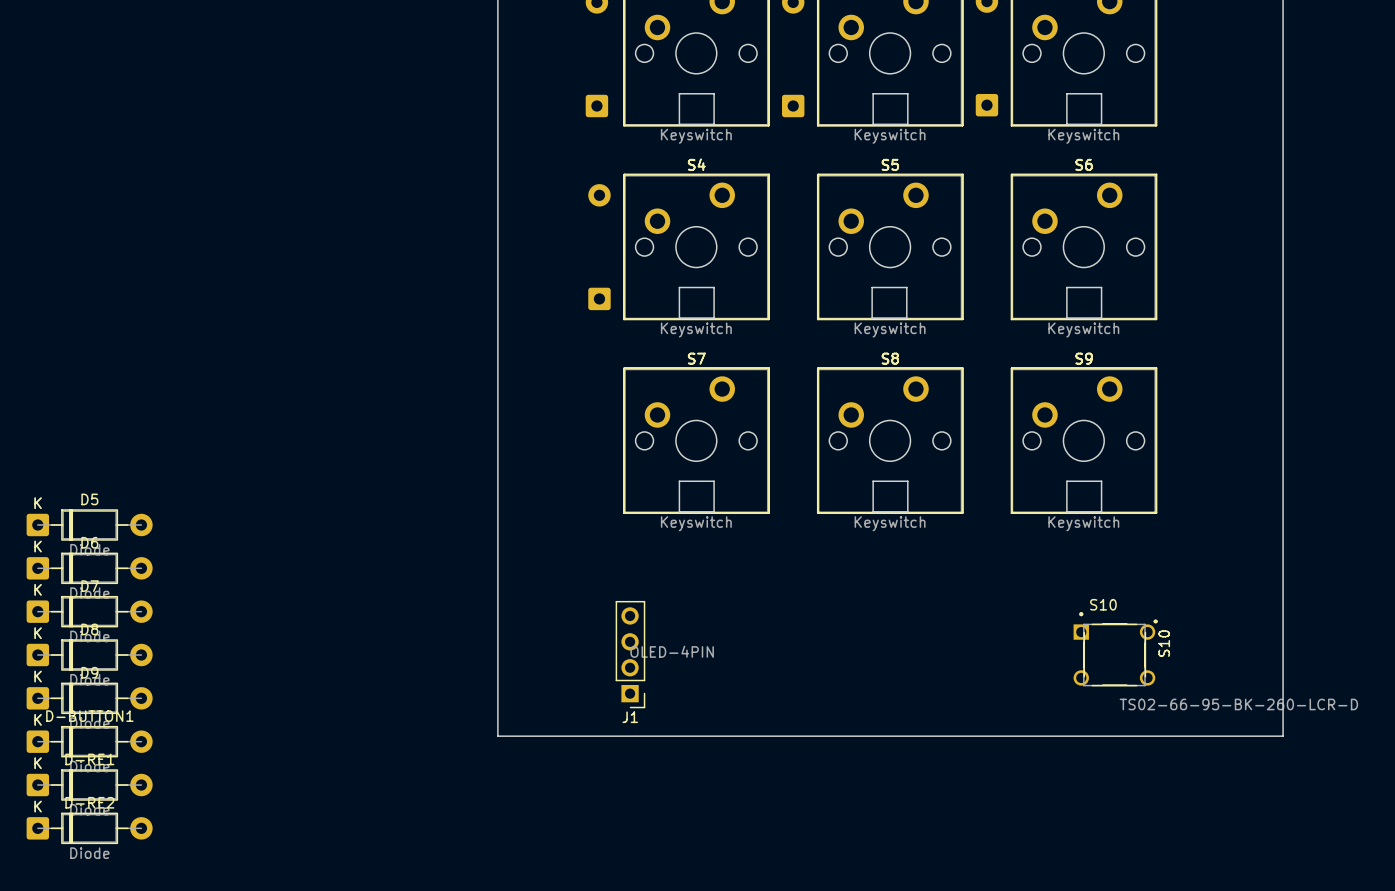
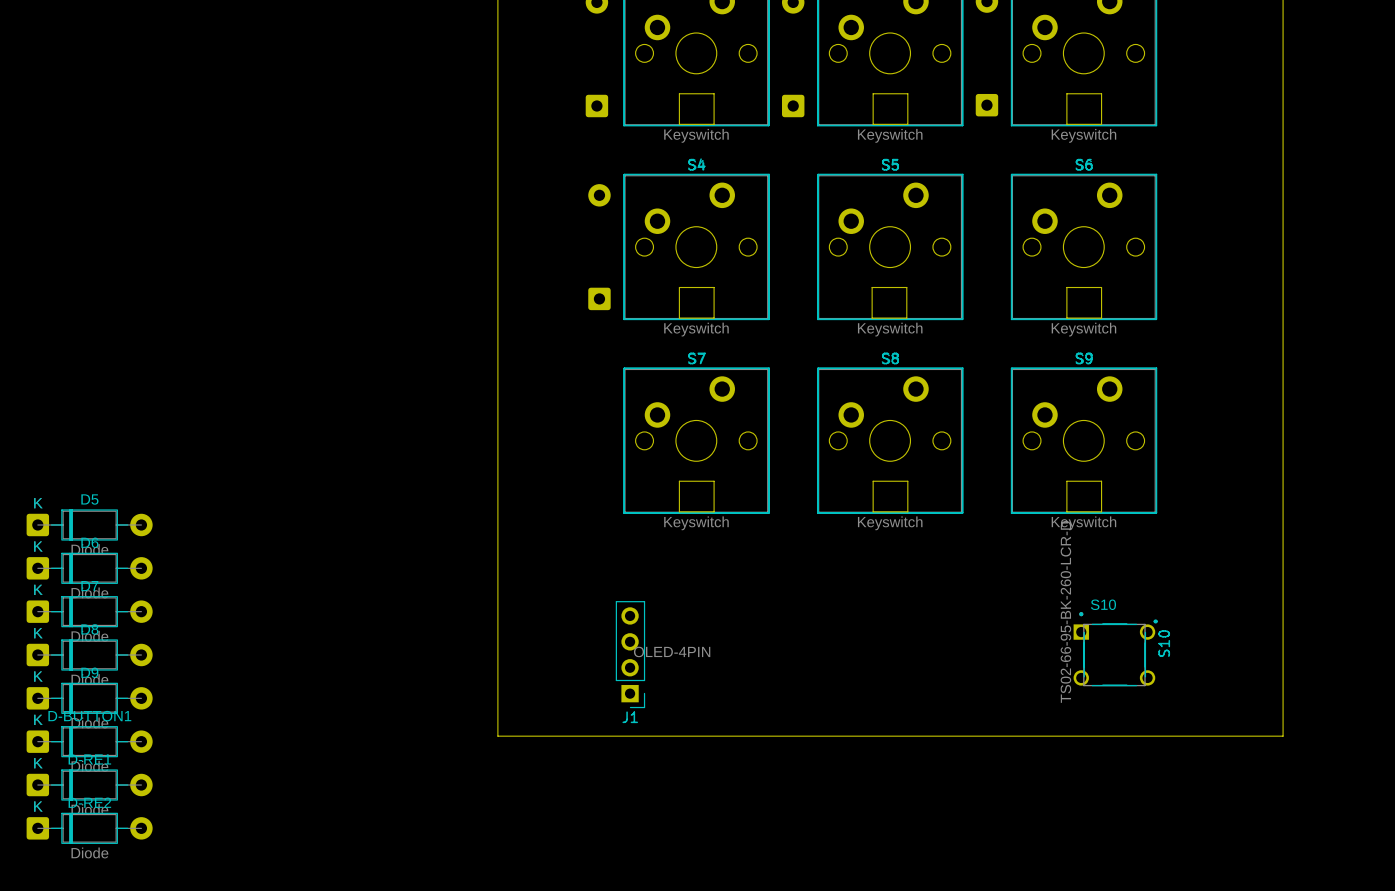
S10 value rotation: 0° (1238, 704) -> 90° counterclockwise (1065, 611)

